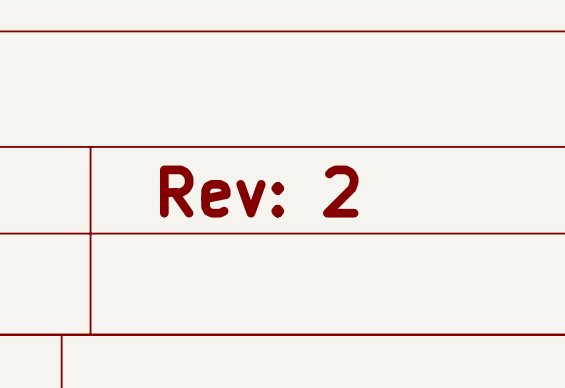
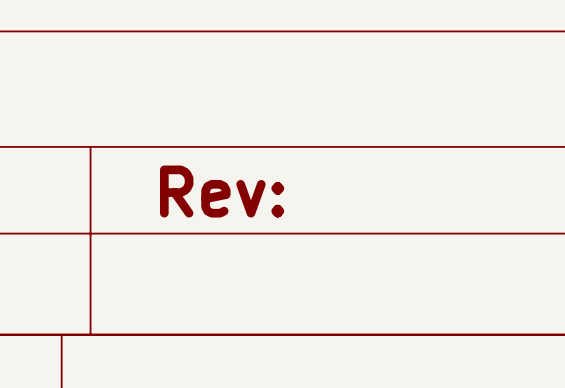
title block: Rev: 2 (259, 191) -> Rev: (222, 191)

